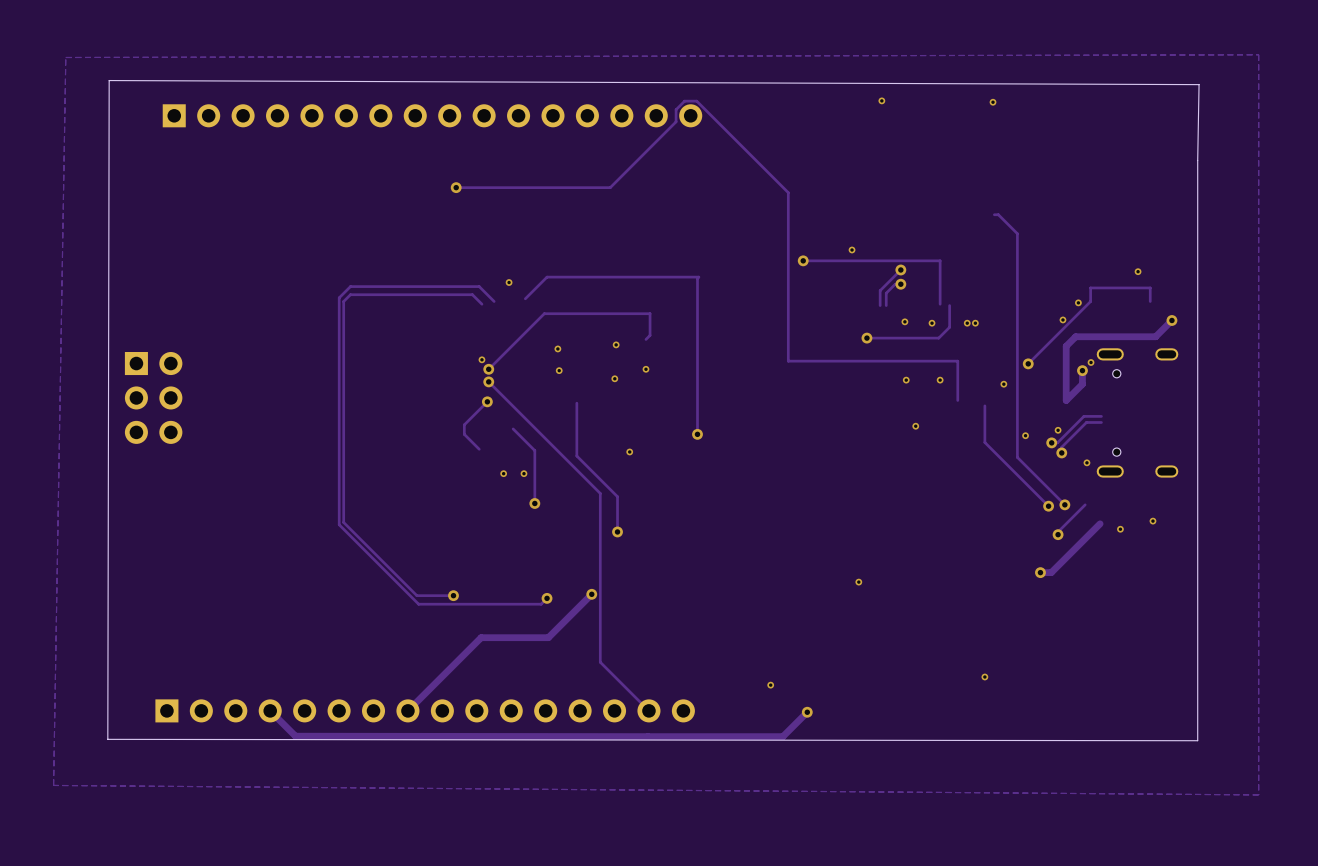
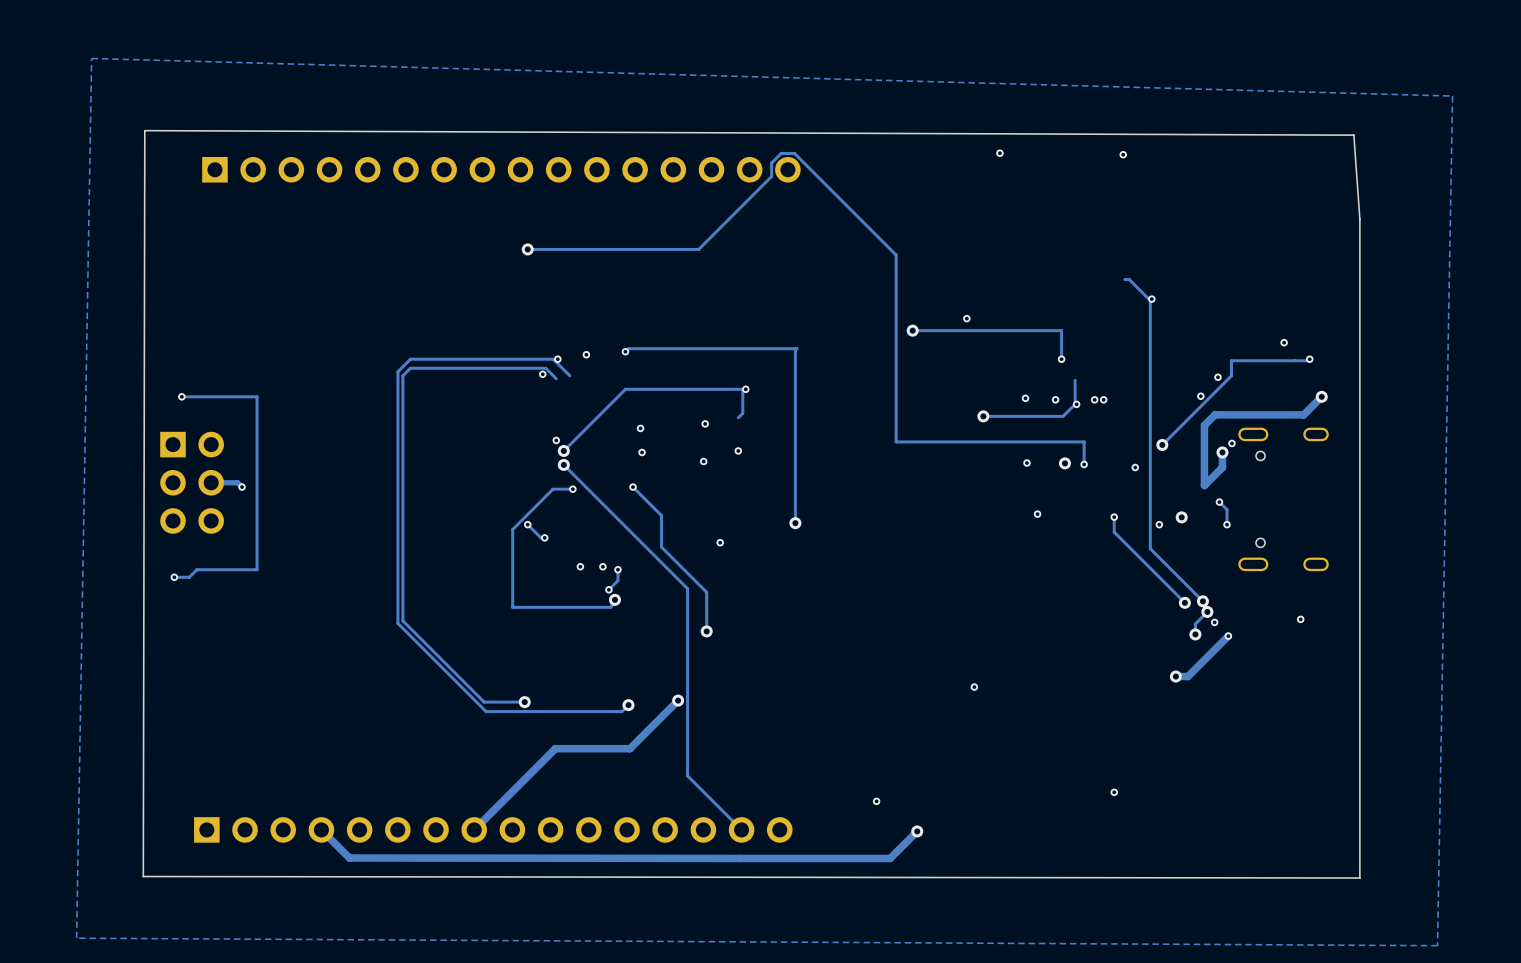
zone outline: (1258, 54) (1258, 794) (53, 785) (65, 57) (1258, 54) -> (91, 58) (1452, 96) (1437, 945) (76, 938) (91, 58)
board edge: (111, 80) (109, 80) (107, 739) (1197, 740) (1199, 84) -> (144, 130) (143, 876) (1359, 878) (1359, 219) (1353, 135) (1351, 135)
via: none -> (1151, 299)
track: (937, 260) (940, 260) (940, 304) -> (1061, 330) (1061, 359)
track: (900, 269) (880, 290) (880, 305) -> none
via: (900, 269) -> none
track: (544, 279) (525, 298) -> none
via: none -> (625, 351)
track: (900, 284) (895, 284) (886, 293) (886, 305) -> none
via: (900, 284) -> none
via: none -> (557, 359)
via: none -> (1061, 359)
via: none -> (1309, 359)
track: (1150, 287) (1150, 301) -> (1297, 360) (1309, 359)
via: none -> (542, 374)
via: none -> (745, 389)
track: none -> (181, 396) (257, 396) (257, 569) (196, 569) (189, 577) (174, 577)
via: none -> (181, 396)
via: none -> (1076, 404)
via position: (940, 380) -> (1084, 464)
via: none -> (1064, 463)
track: (957, 381) (957, 400) -> none
track: none -> (211, 482) (237, 482) (242, 487)
via: none -> (242, 487)
track: (487, 401) (464, 424) (464, 434) (479, 449) -> none
via: (487, 401) -> none
via: none -> (633, 487)
track: none -> (572, 489) (553, 489) (512, 529) (512, 607) (610, 607) (614, 602)
via: none -> (572, 489)
track: (576, 403) (576, 427) -> (633, 487) (661, 515)
track: (984, 405) (984, 428) -> none
track: none -> (1219, 502) (1227, 509) (1227, 524)
via: none -> (1219, 502)
track: (1101, 416) (1083, 416) (1057, 442) (1051, 442) -> none
track: (1101, 422) (1086, 422) (1061, 447) (1061, 452) -> none
track: (513, 428) (534, 450) (534, 503) -> none
via: none -> (1114, 517)
via: none -> (1181, 517)
via: (1058, 430) -> none
track: none -> (527, 524) (540, 537) (544, 537)
via: none -> (527, 524)
via: none -> (1227, 524)
via: (1051, 442) -> none
via: none -> (544, 537)
via: (1061, 452) -> none
via: (1086, 462) -> none
track: none -> (617, 569) (617, 580) (608, 589)
via: none -> (617, 569)
via: none -> (174, 577)
via: none -> (608, 589)
track: (1085, 504) (1058, 531) -> (1207, 611) (1195, 623) (1195, 631)
via: none -> (1207, 611)
via: none -> (1214, 622)
track: (1100, 523) (1087, 536) -> none
via: (1120, 529) -> none
via: none -> (1228, 636)

